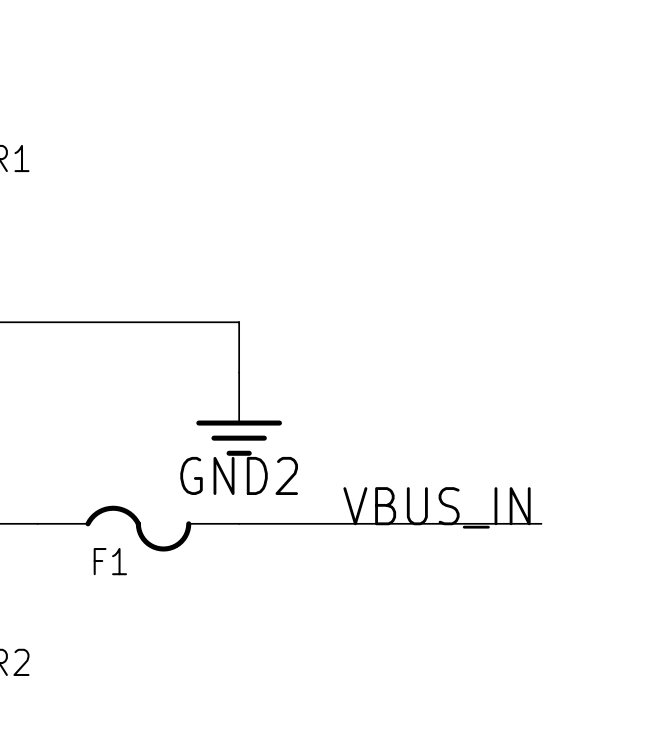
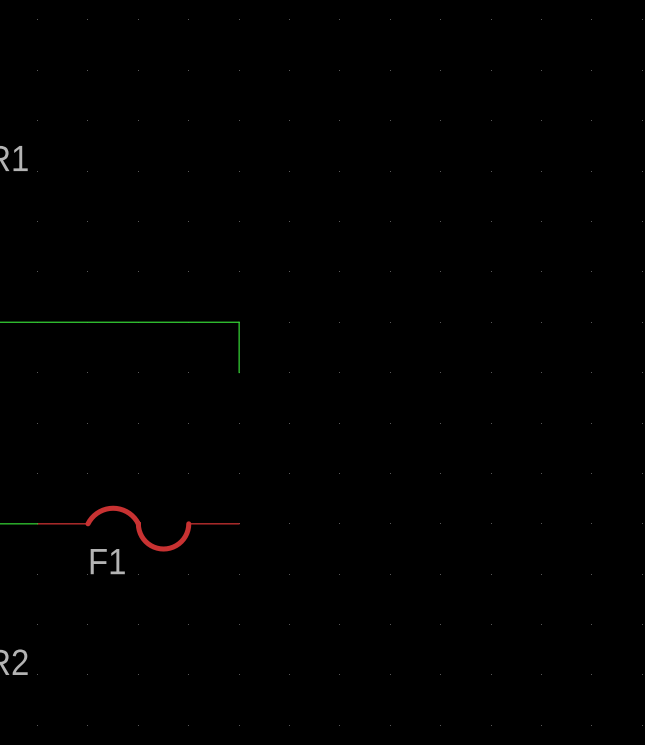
power symbol: GND2 (239, 414) -> none
label: VBUS_IN (437, 507) -> none
wire: (239, 523) (541, 523) -> none

